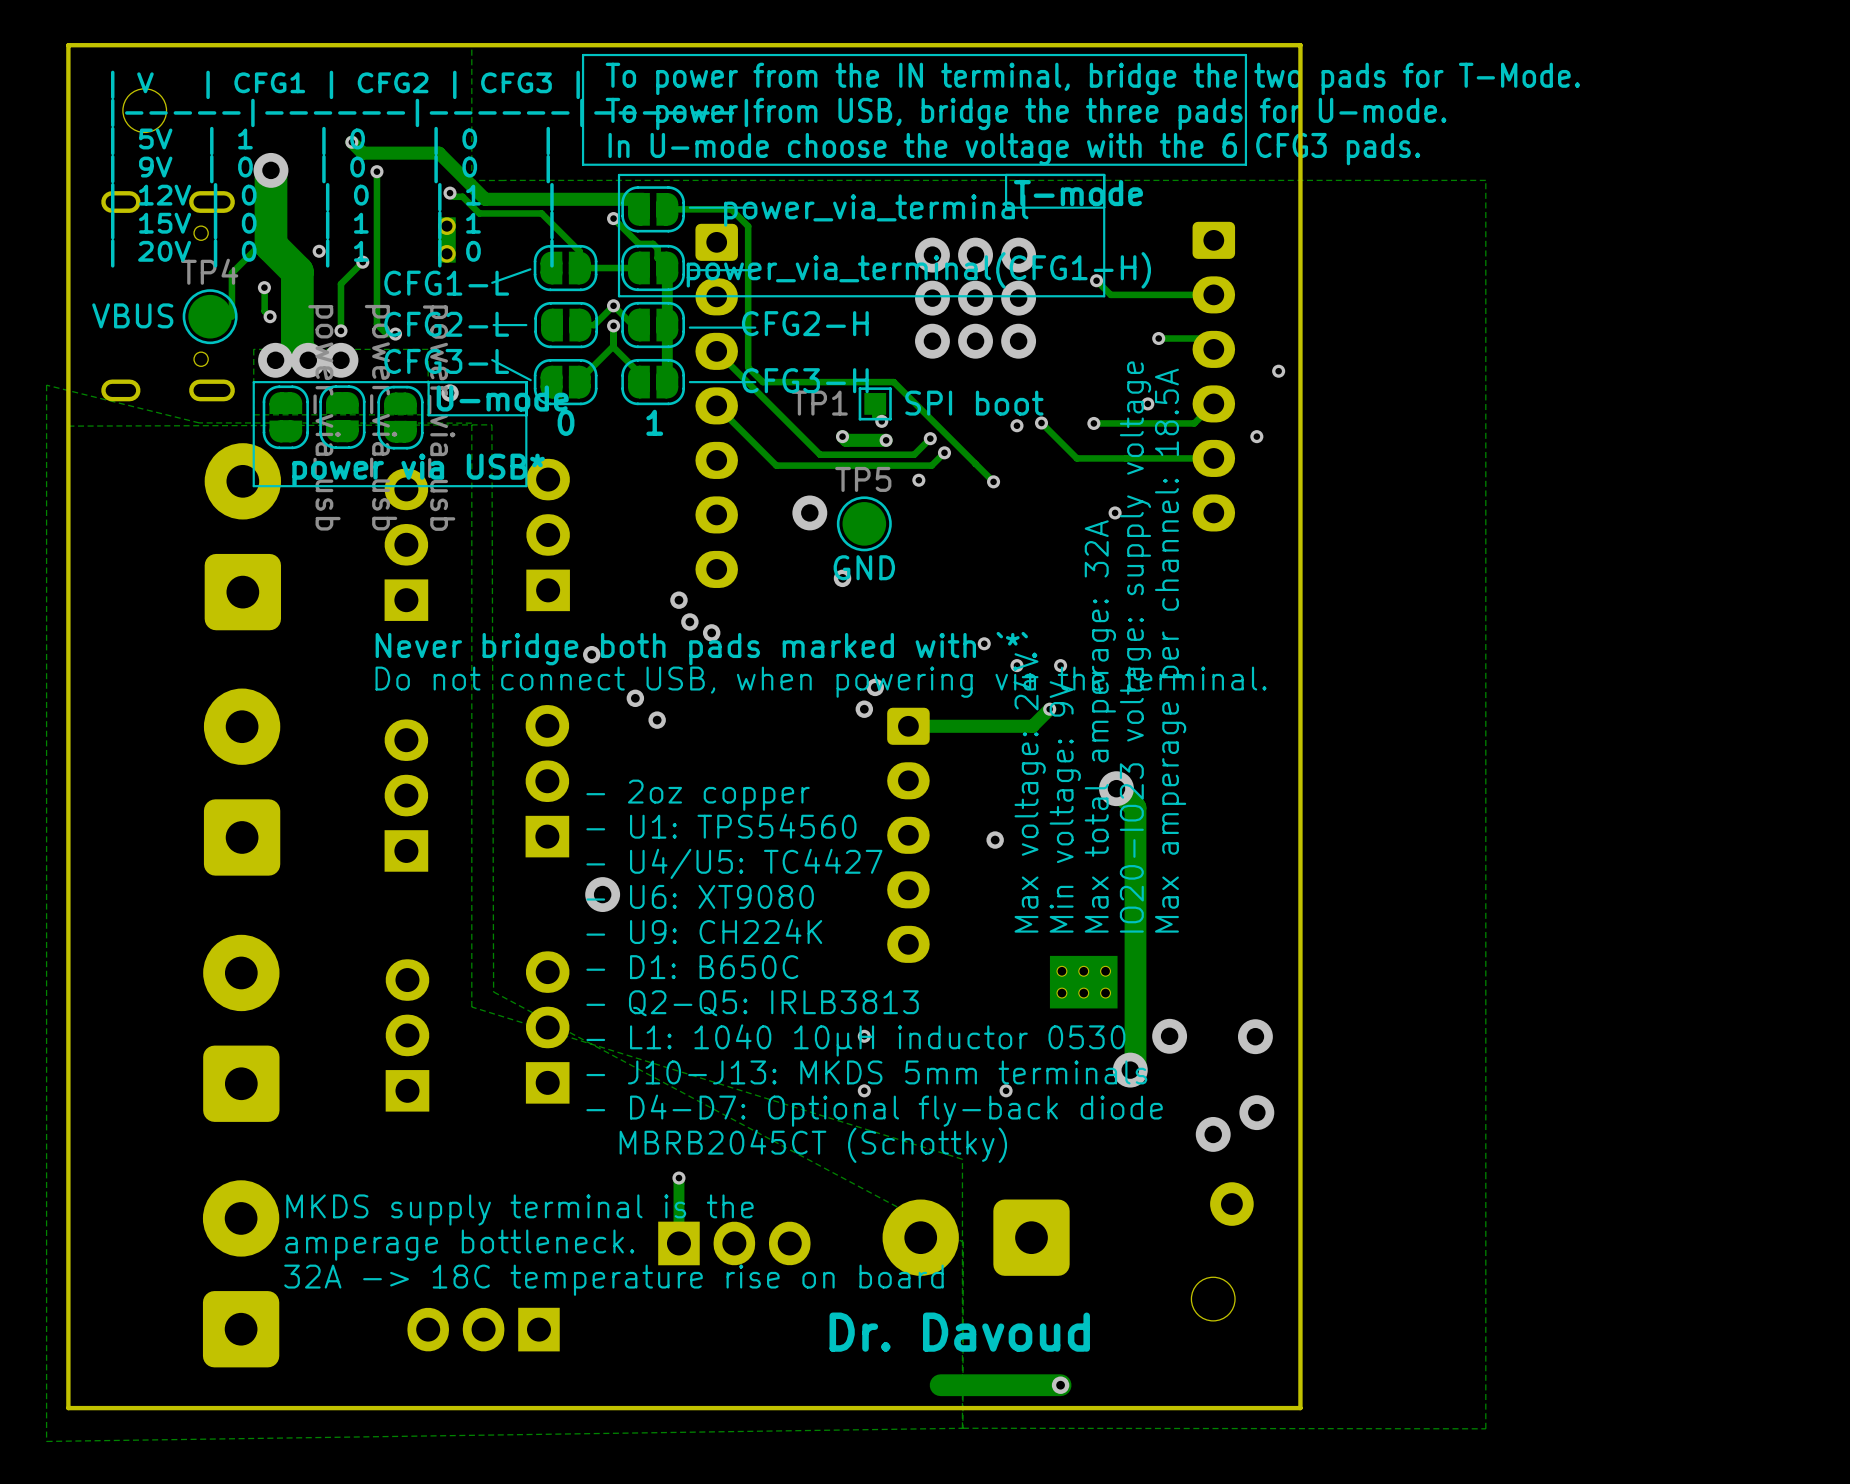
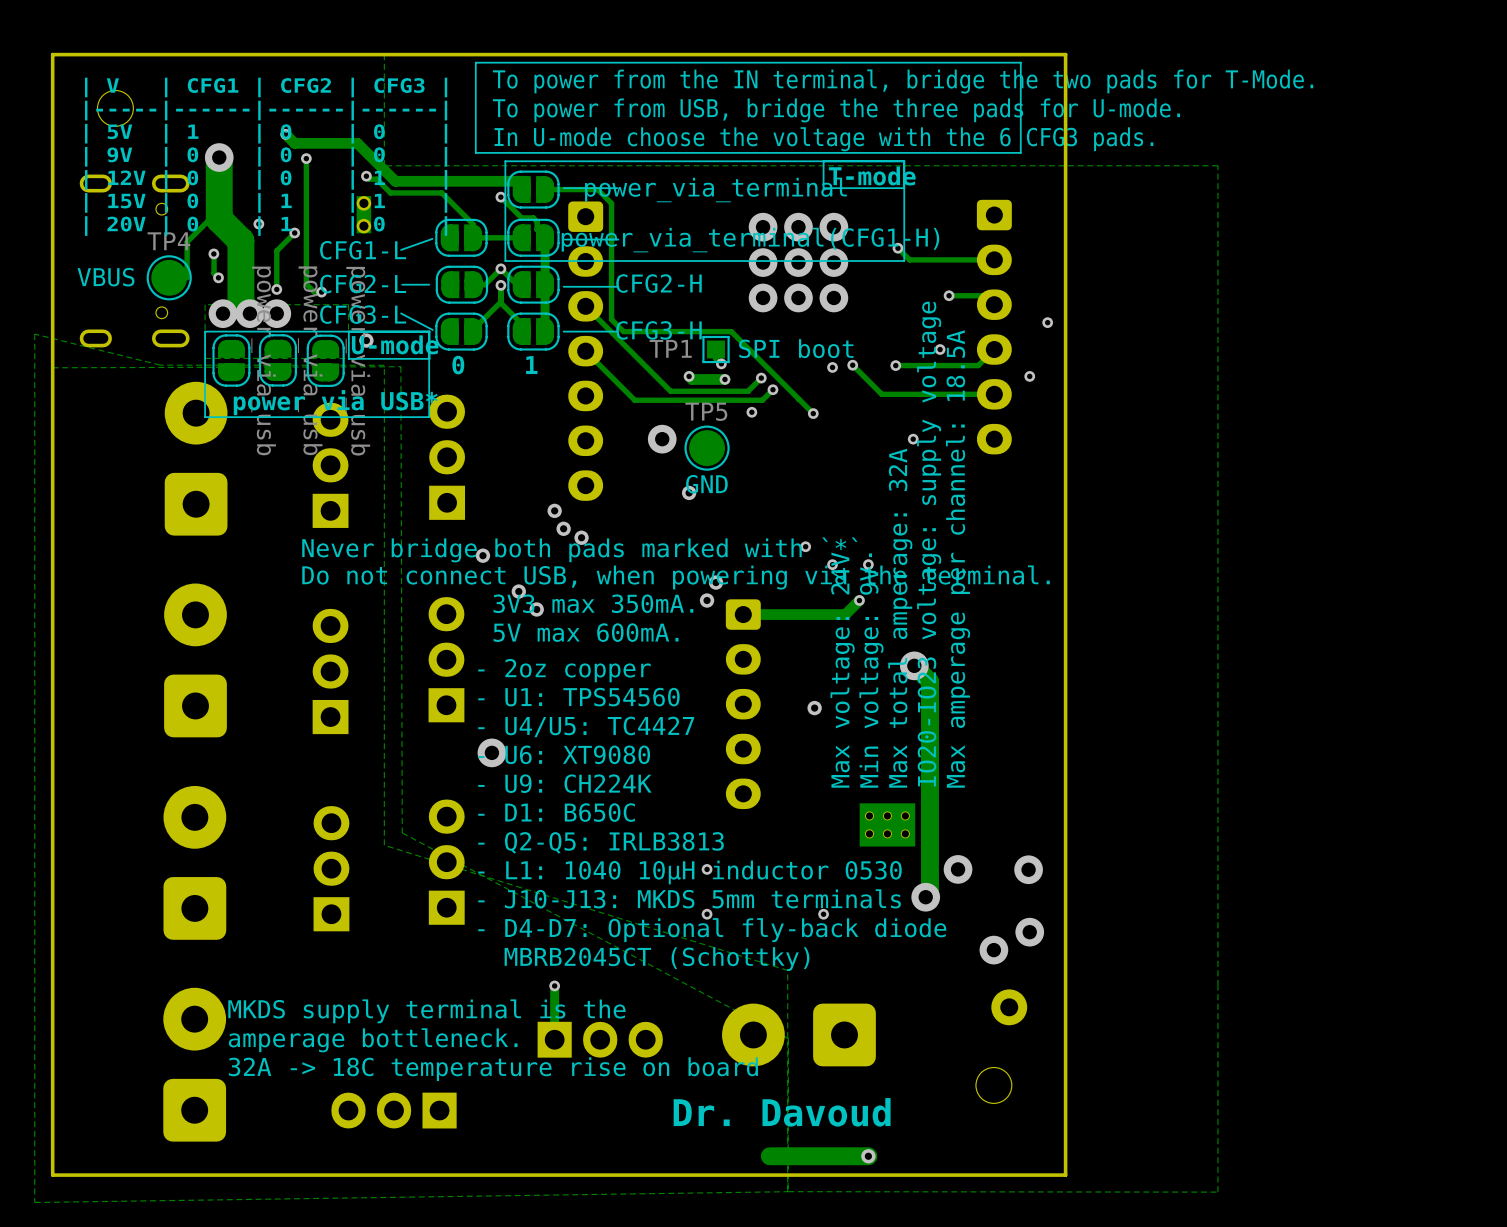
text: none -> 3V3 max 350mA. (593, 603)
text: none -> 5V max 600mA. (586, 632)

